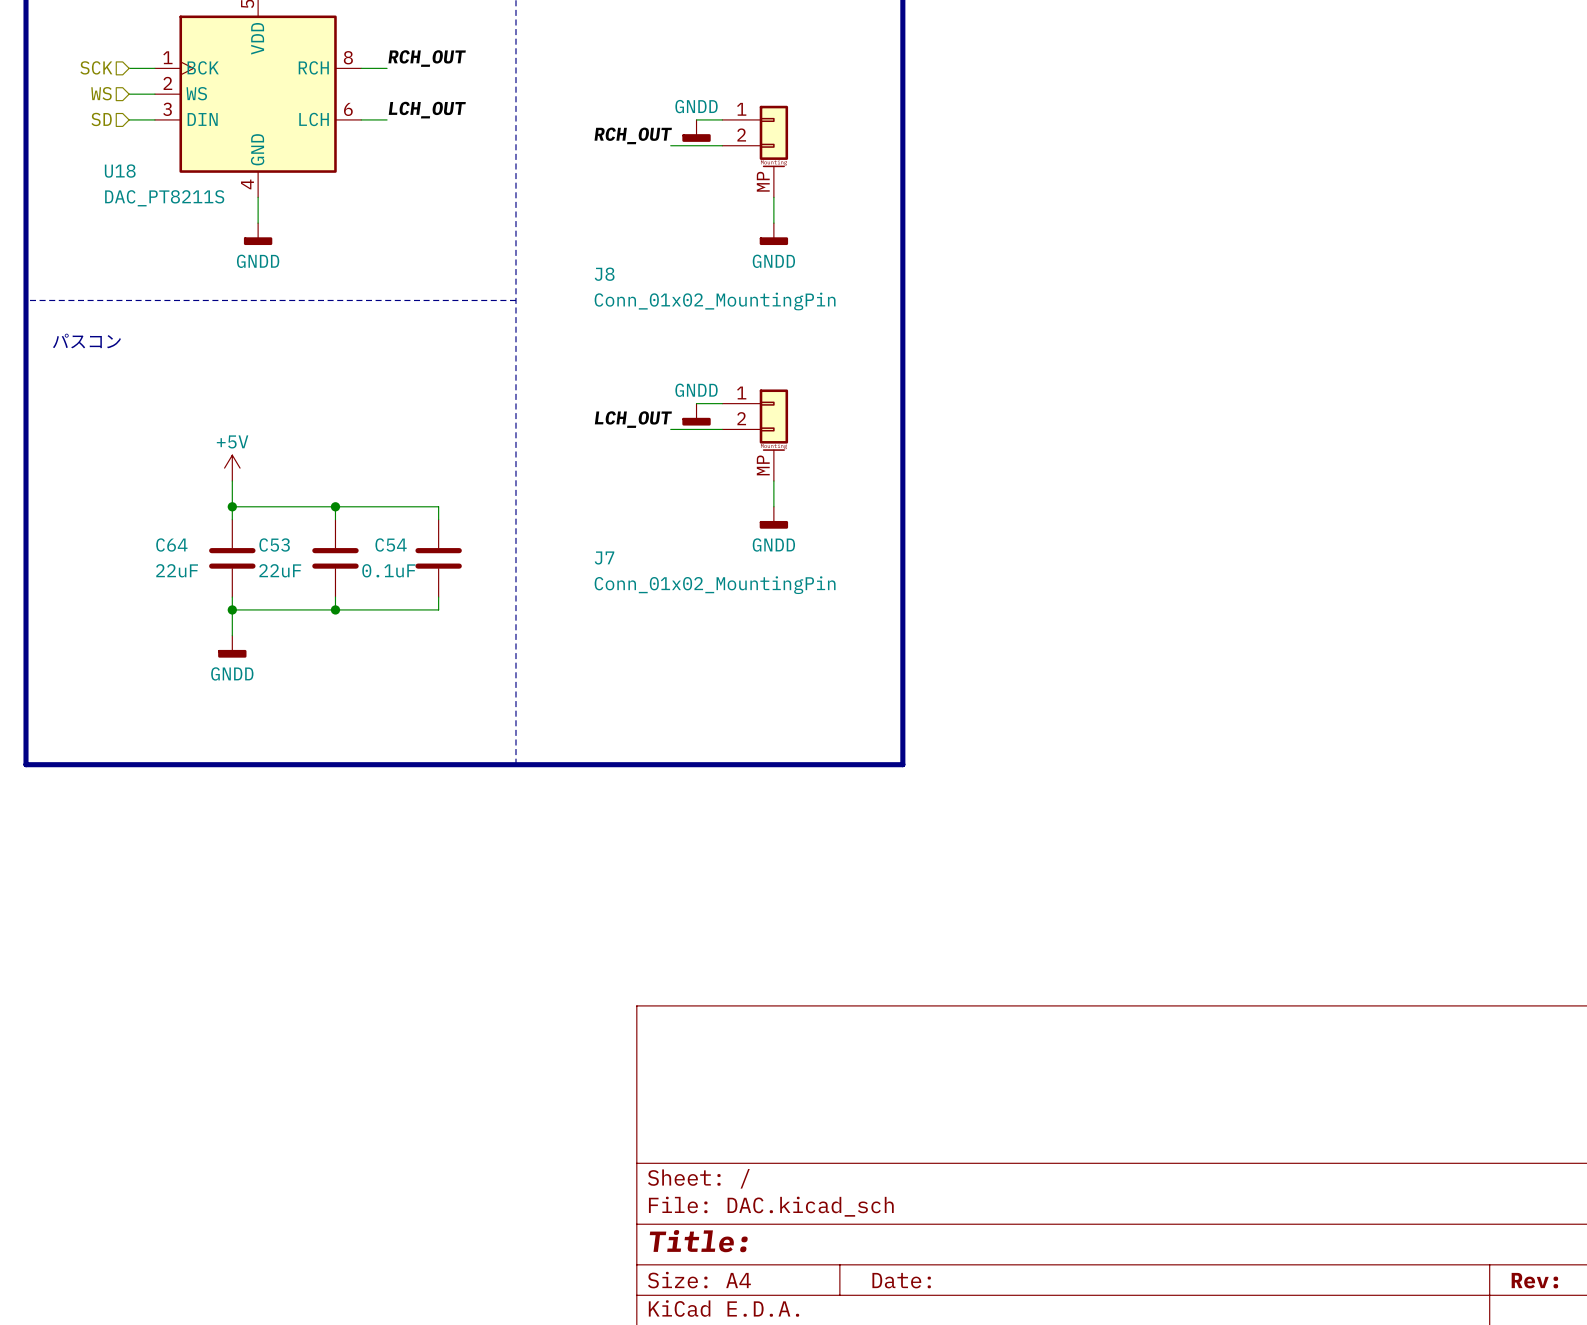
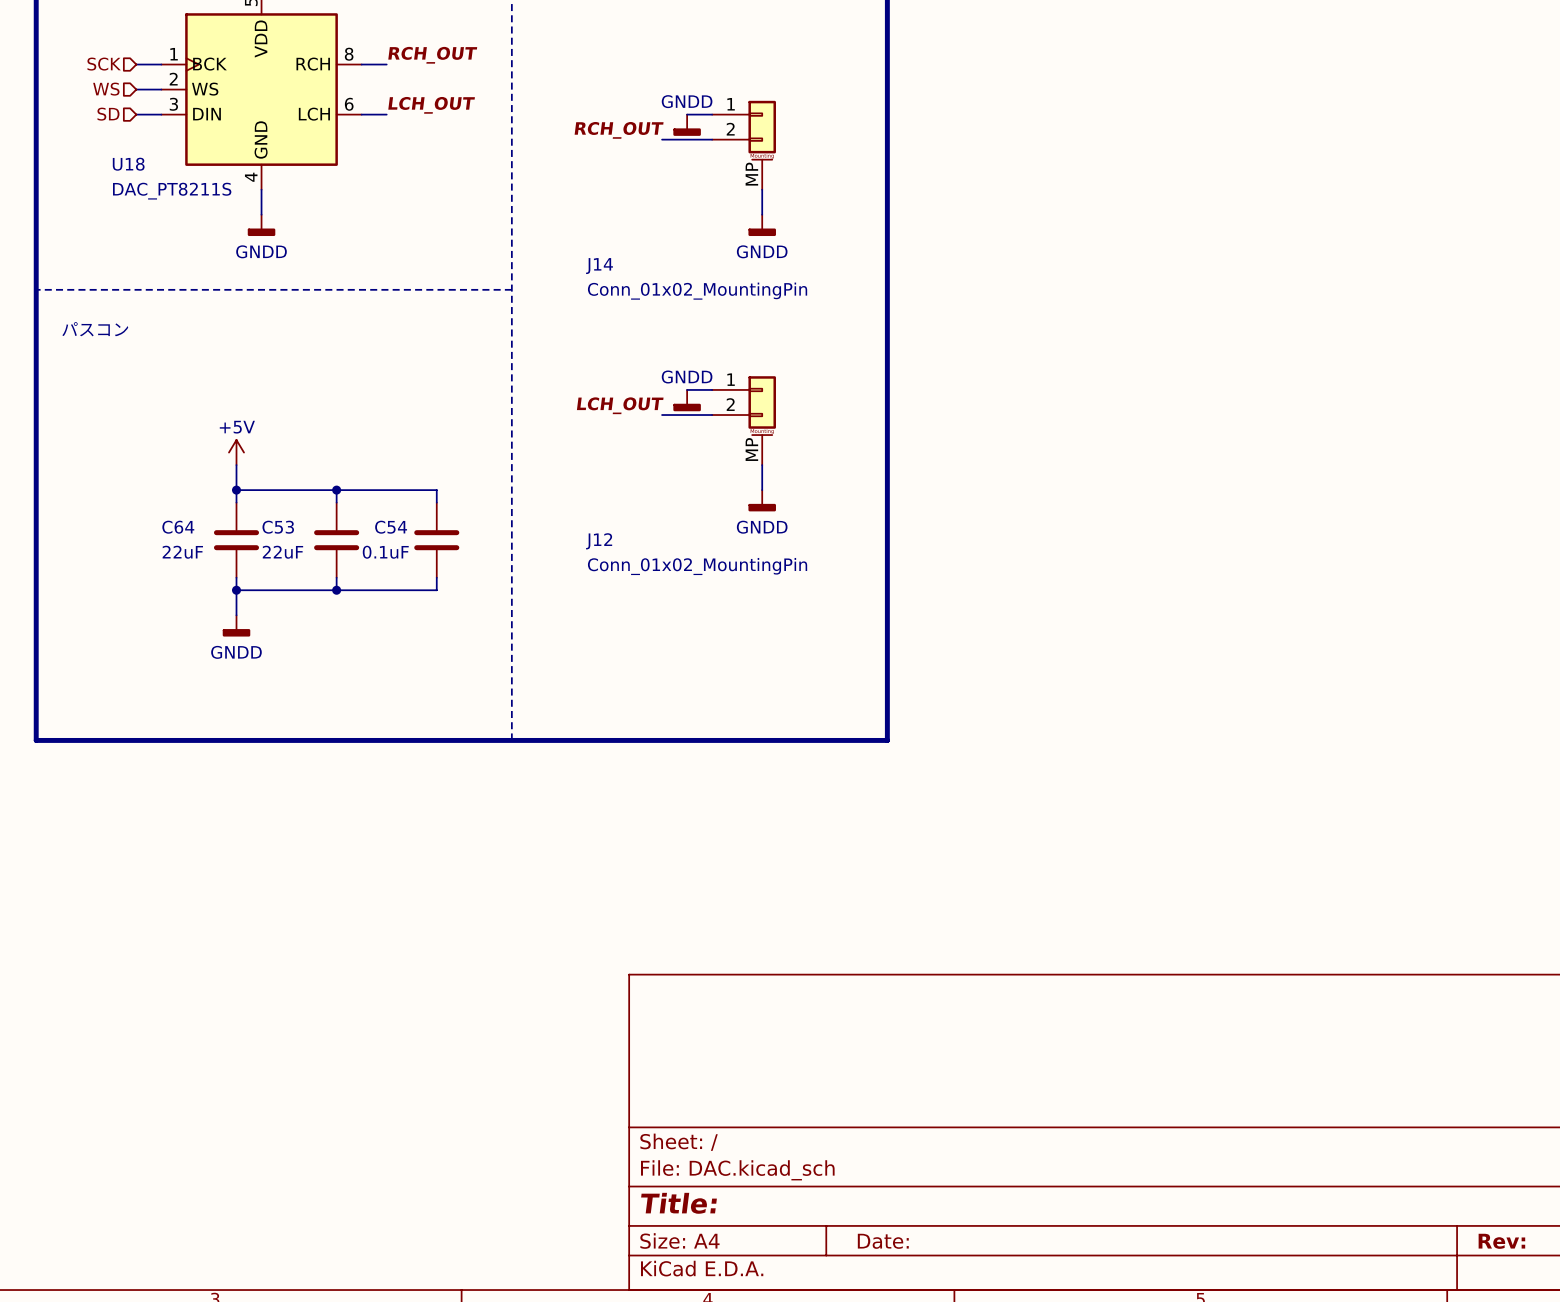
J8 name: J8 (604, 274) -> J14 (599, 266)
J7 name: J7 (604, 558) -> J12 (599, 541)

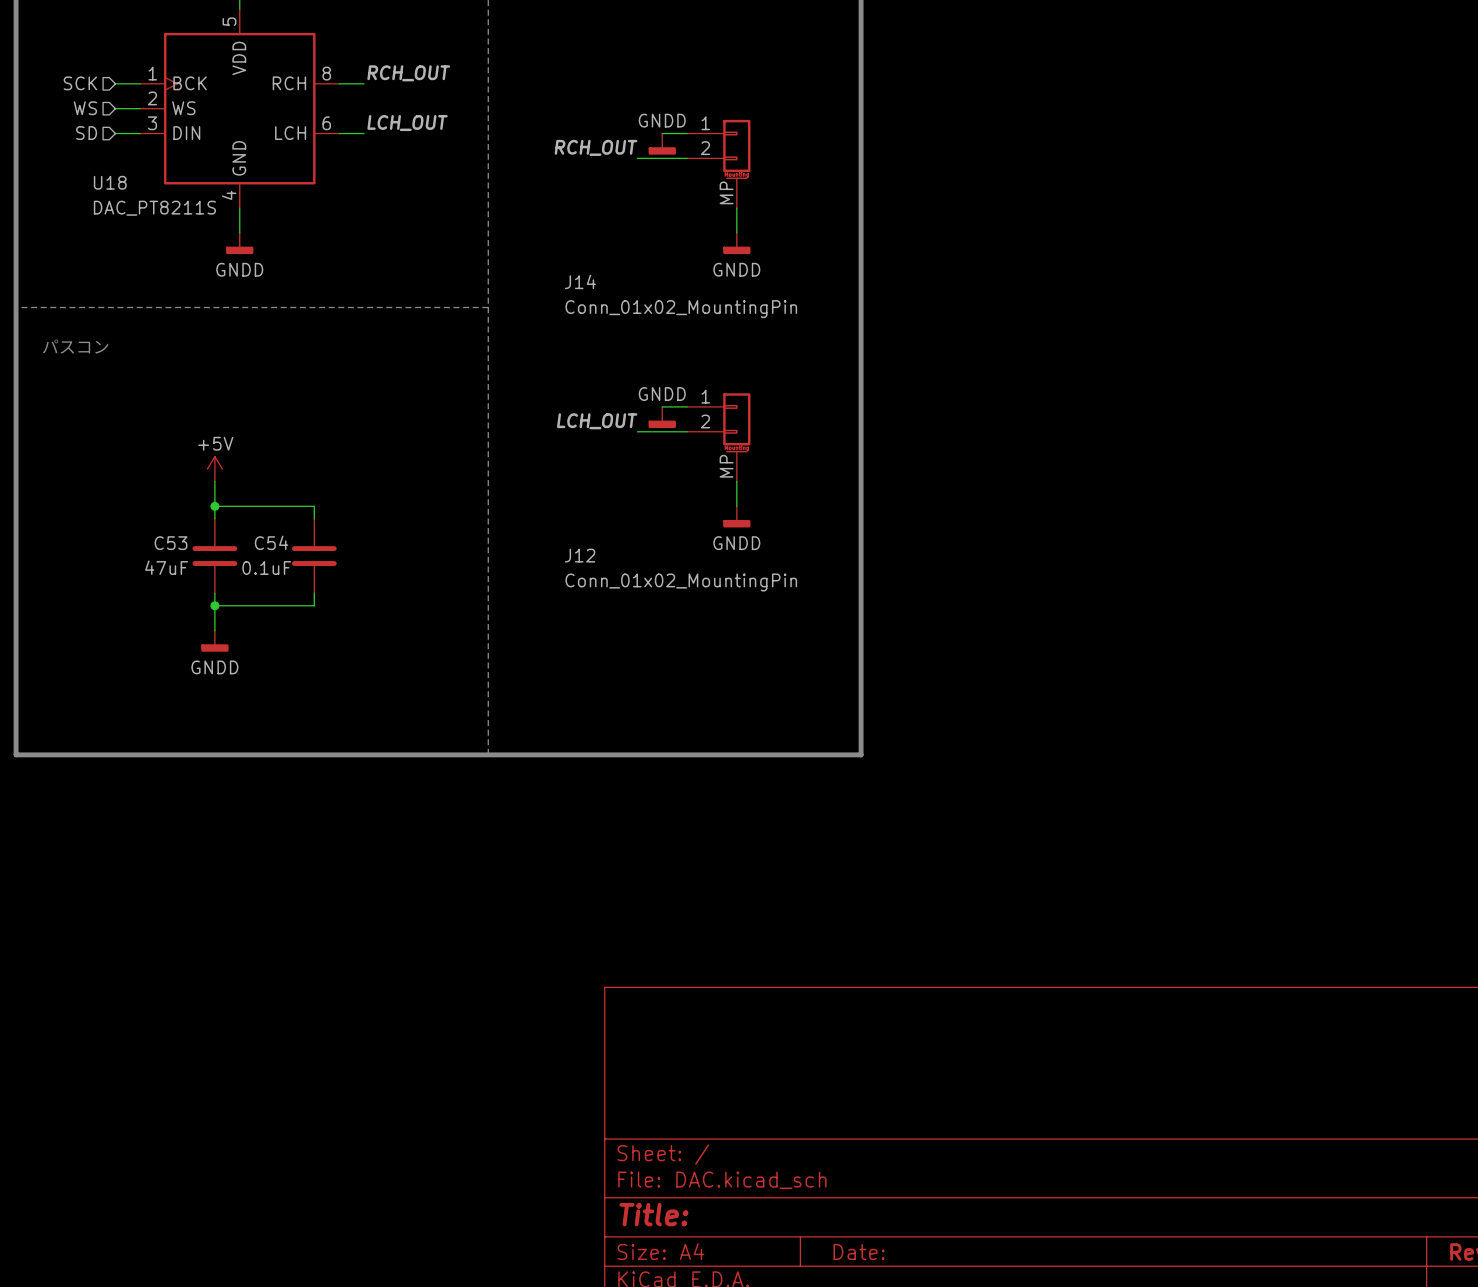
wire: (336, 490) (436, 490) (436, 502) -> none
junction: (336, 490) -> none
C64 name: C64 (178, 527) -> C53 (171, 543)
C53 name: C53 (278, 527) -> C54 (271, 542)
C54: 0.1uF (436, 540) -> none
C64 value: 22uF (182, 552) -> 47uF (166, 567)
C53 value: 22uF (282, 552) -> 0.1uF (266, 568)
wire: (436, 577) (436, 590) (336, 590) -> none
junction: (336, 590) -> none

